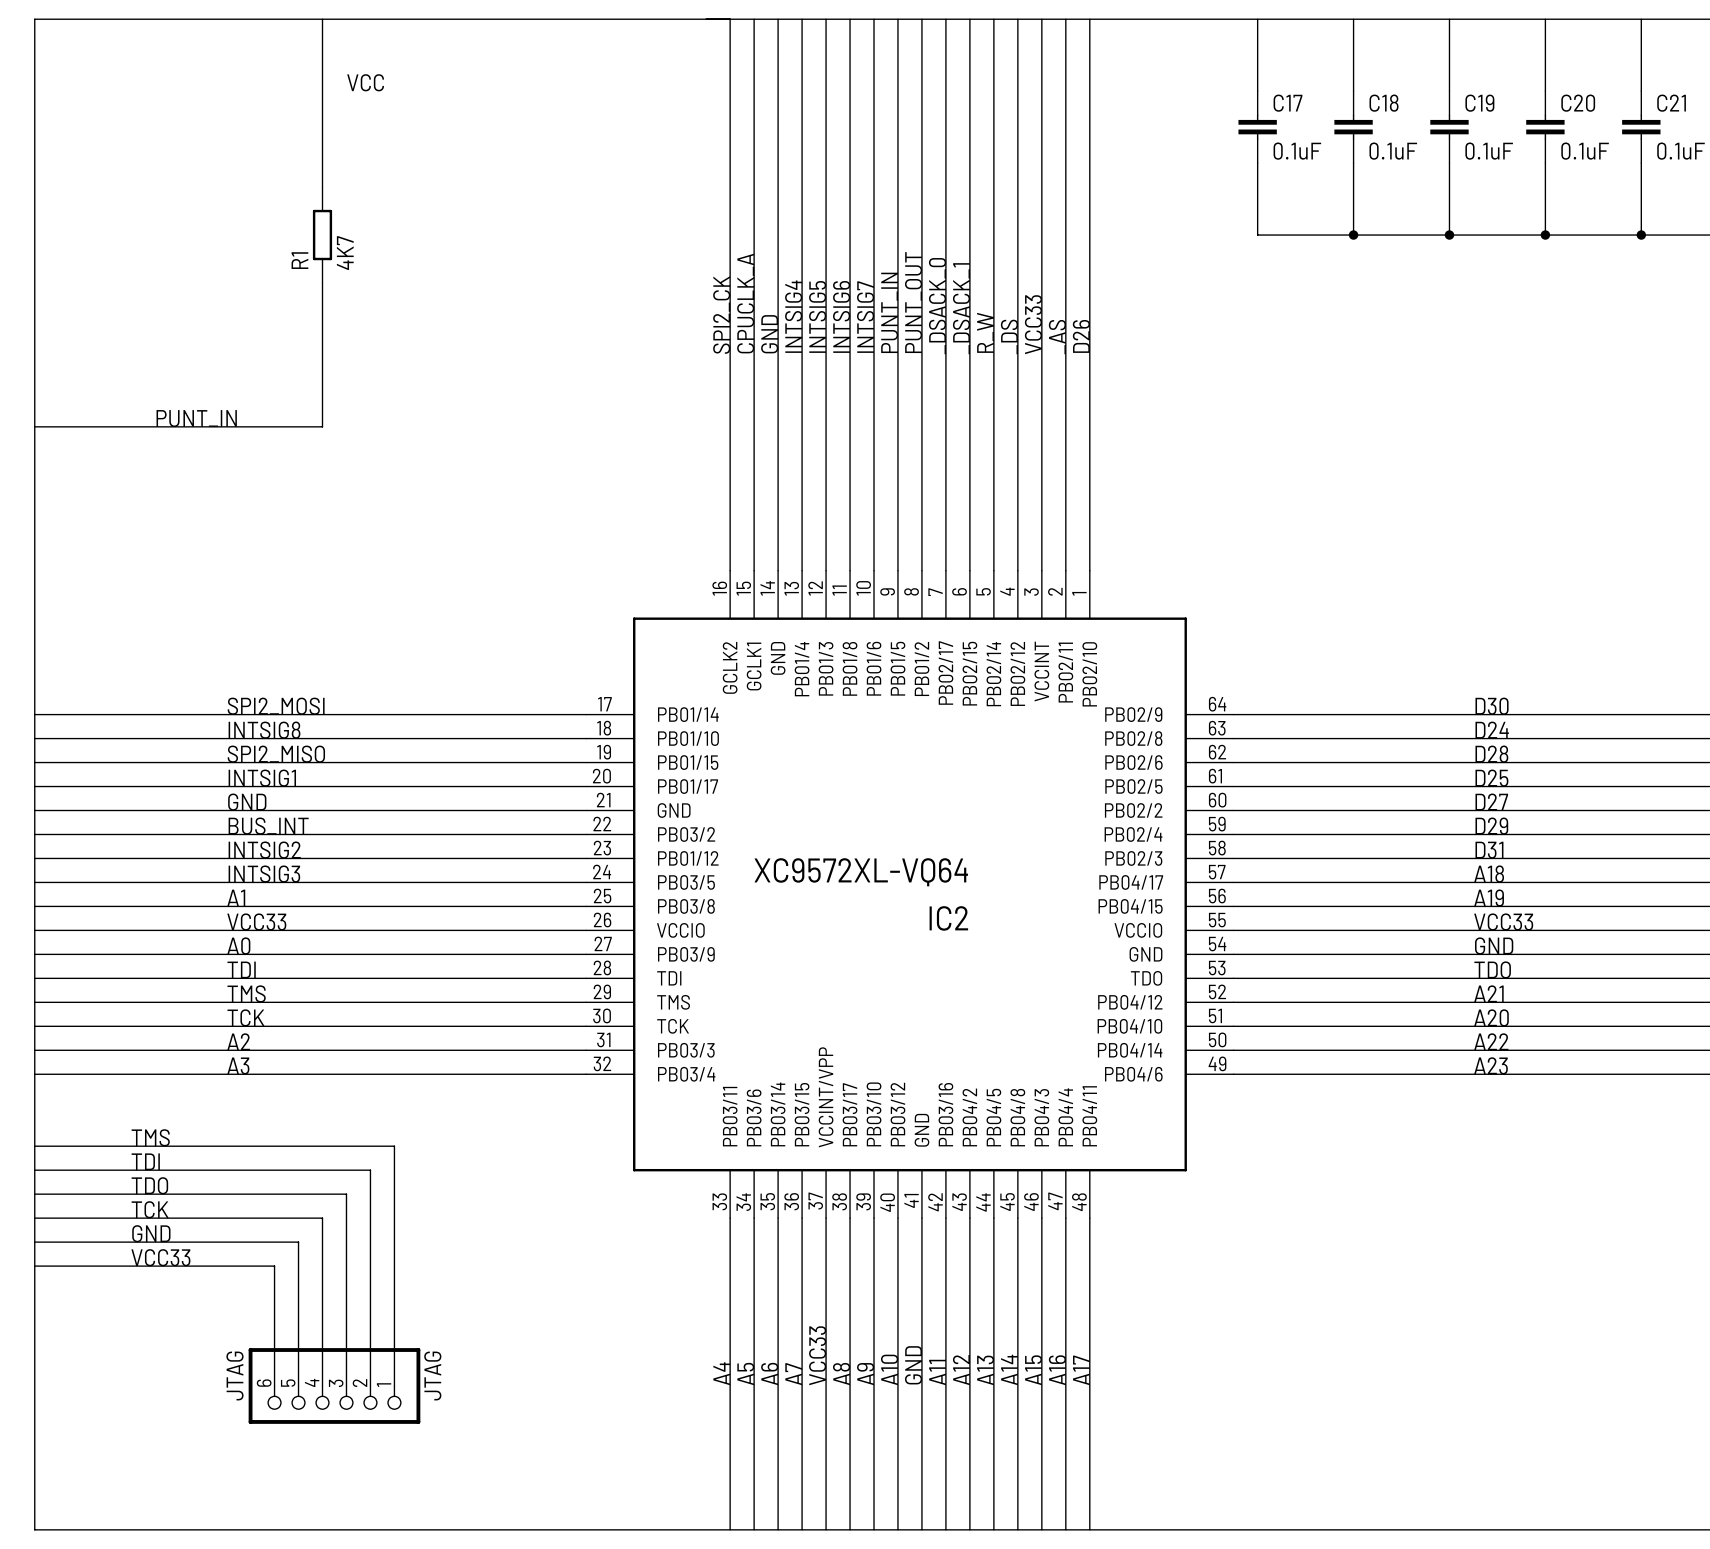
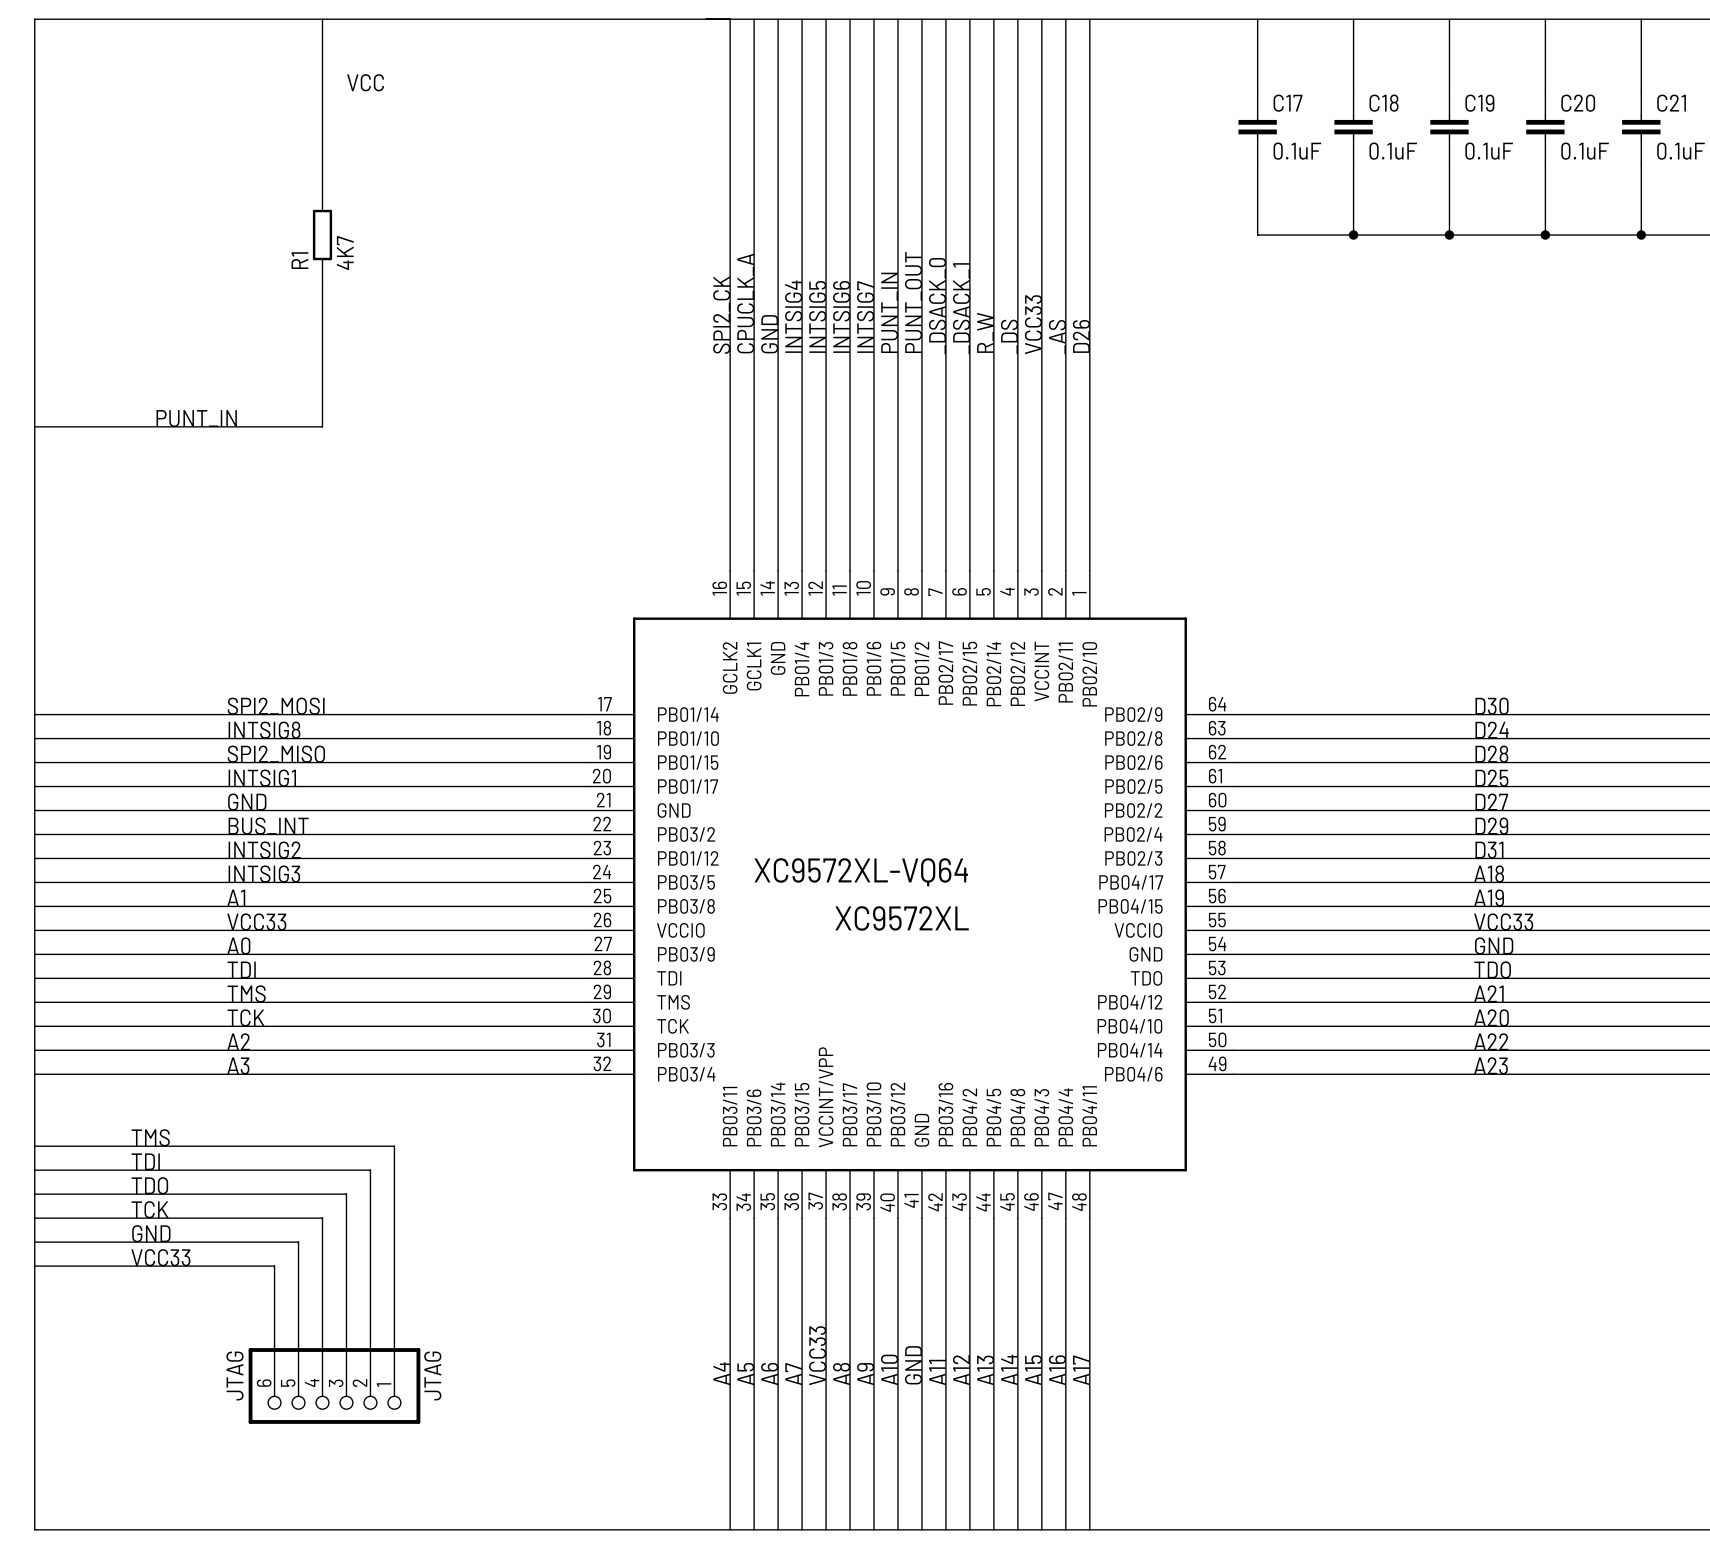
IC2 name: IC2 (948, 918) -> XC9572XL (902, 918)

